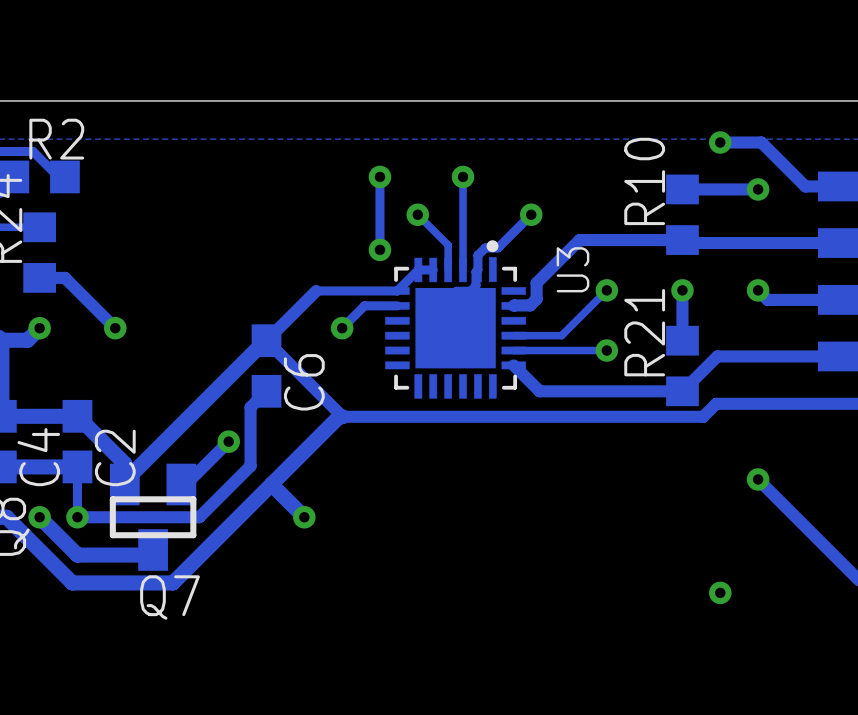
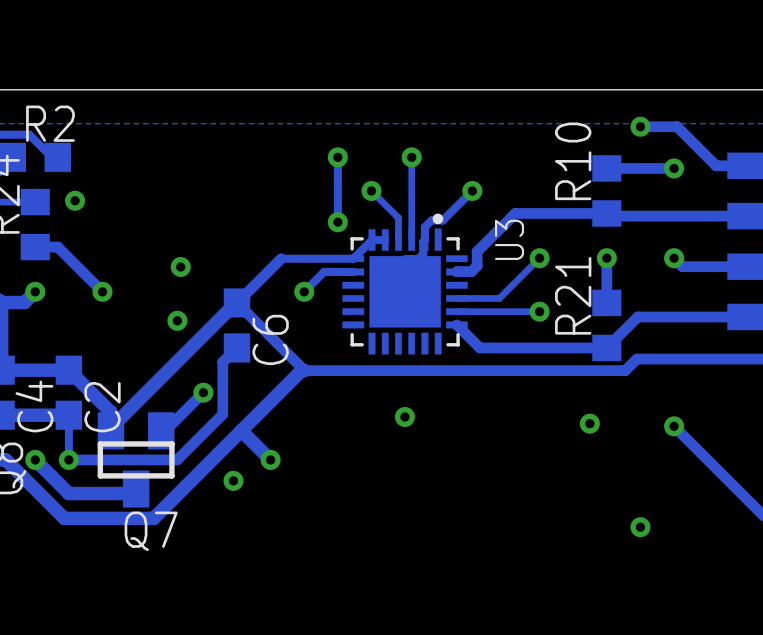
via: none -> (75, 200)
via: none -> (180, 267)
via: none -> (177, 320)
via: none -> (404, 416)
via: none -> (589, 423)
via: none -> (233, 480)

